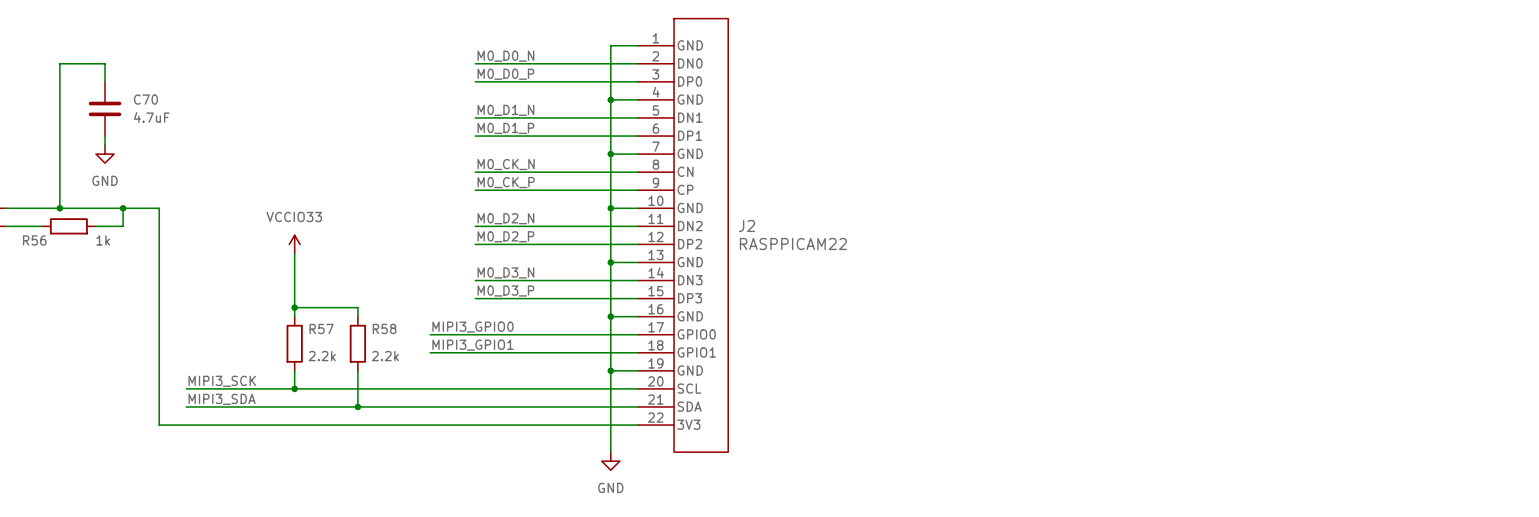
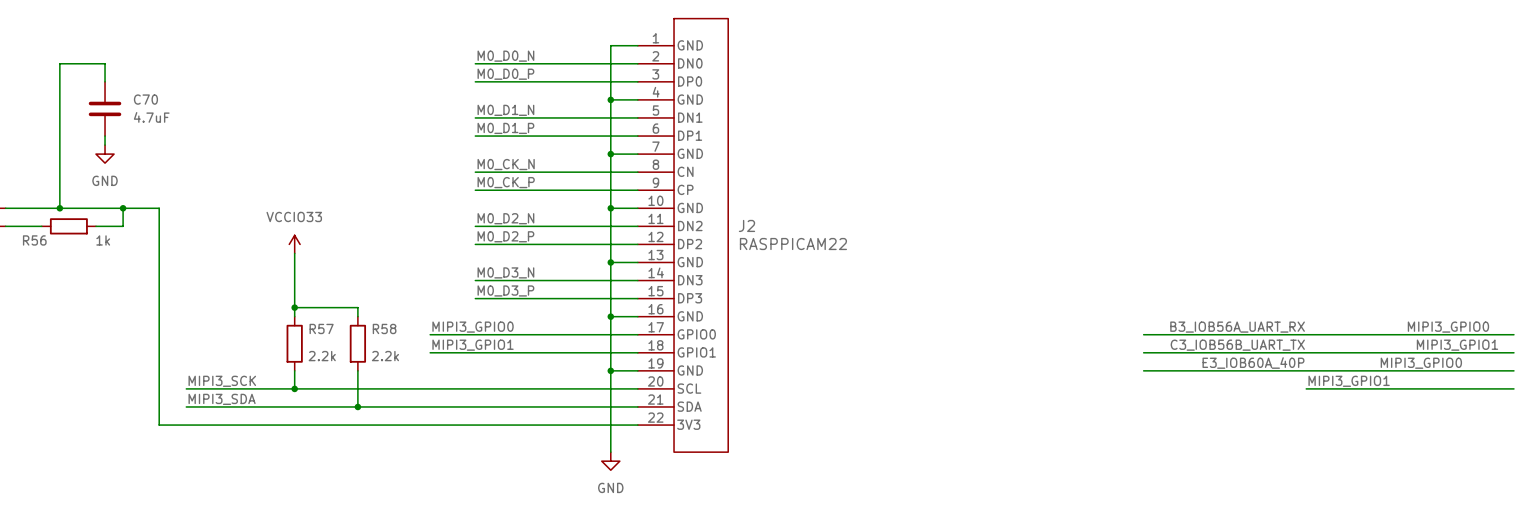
label: none -> B3_IOB56A_UART_RX (1237, 327)
label: none -> MIPI3_GPIO0 (1448, 327)
wire: none -> (1143, 334) (1513, 334)
label: none -> C3_IOB56B_UART_TX (1237, 345)
label: none -> MIPI3_GPIO1 (1457, 345)
wire: none -> (1143, 352) (1513, 352)
label: none -> E3_IOB60A_40P (1253, 363)
label: none -> MIPI3_GPIO0 (1421, 363)
wire: none -> (1143, 370) (1513, 370)
label: none -> MIPI3_GPIO1 (1349, 381)
wire: none -> (1306, 388) (1513, 388)

